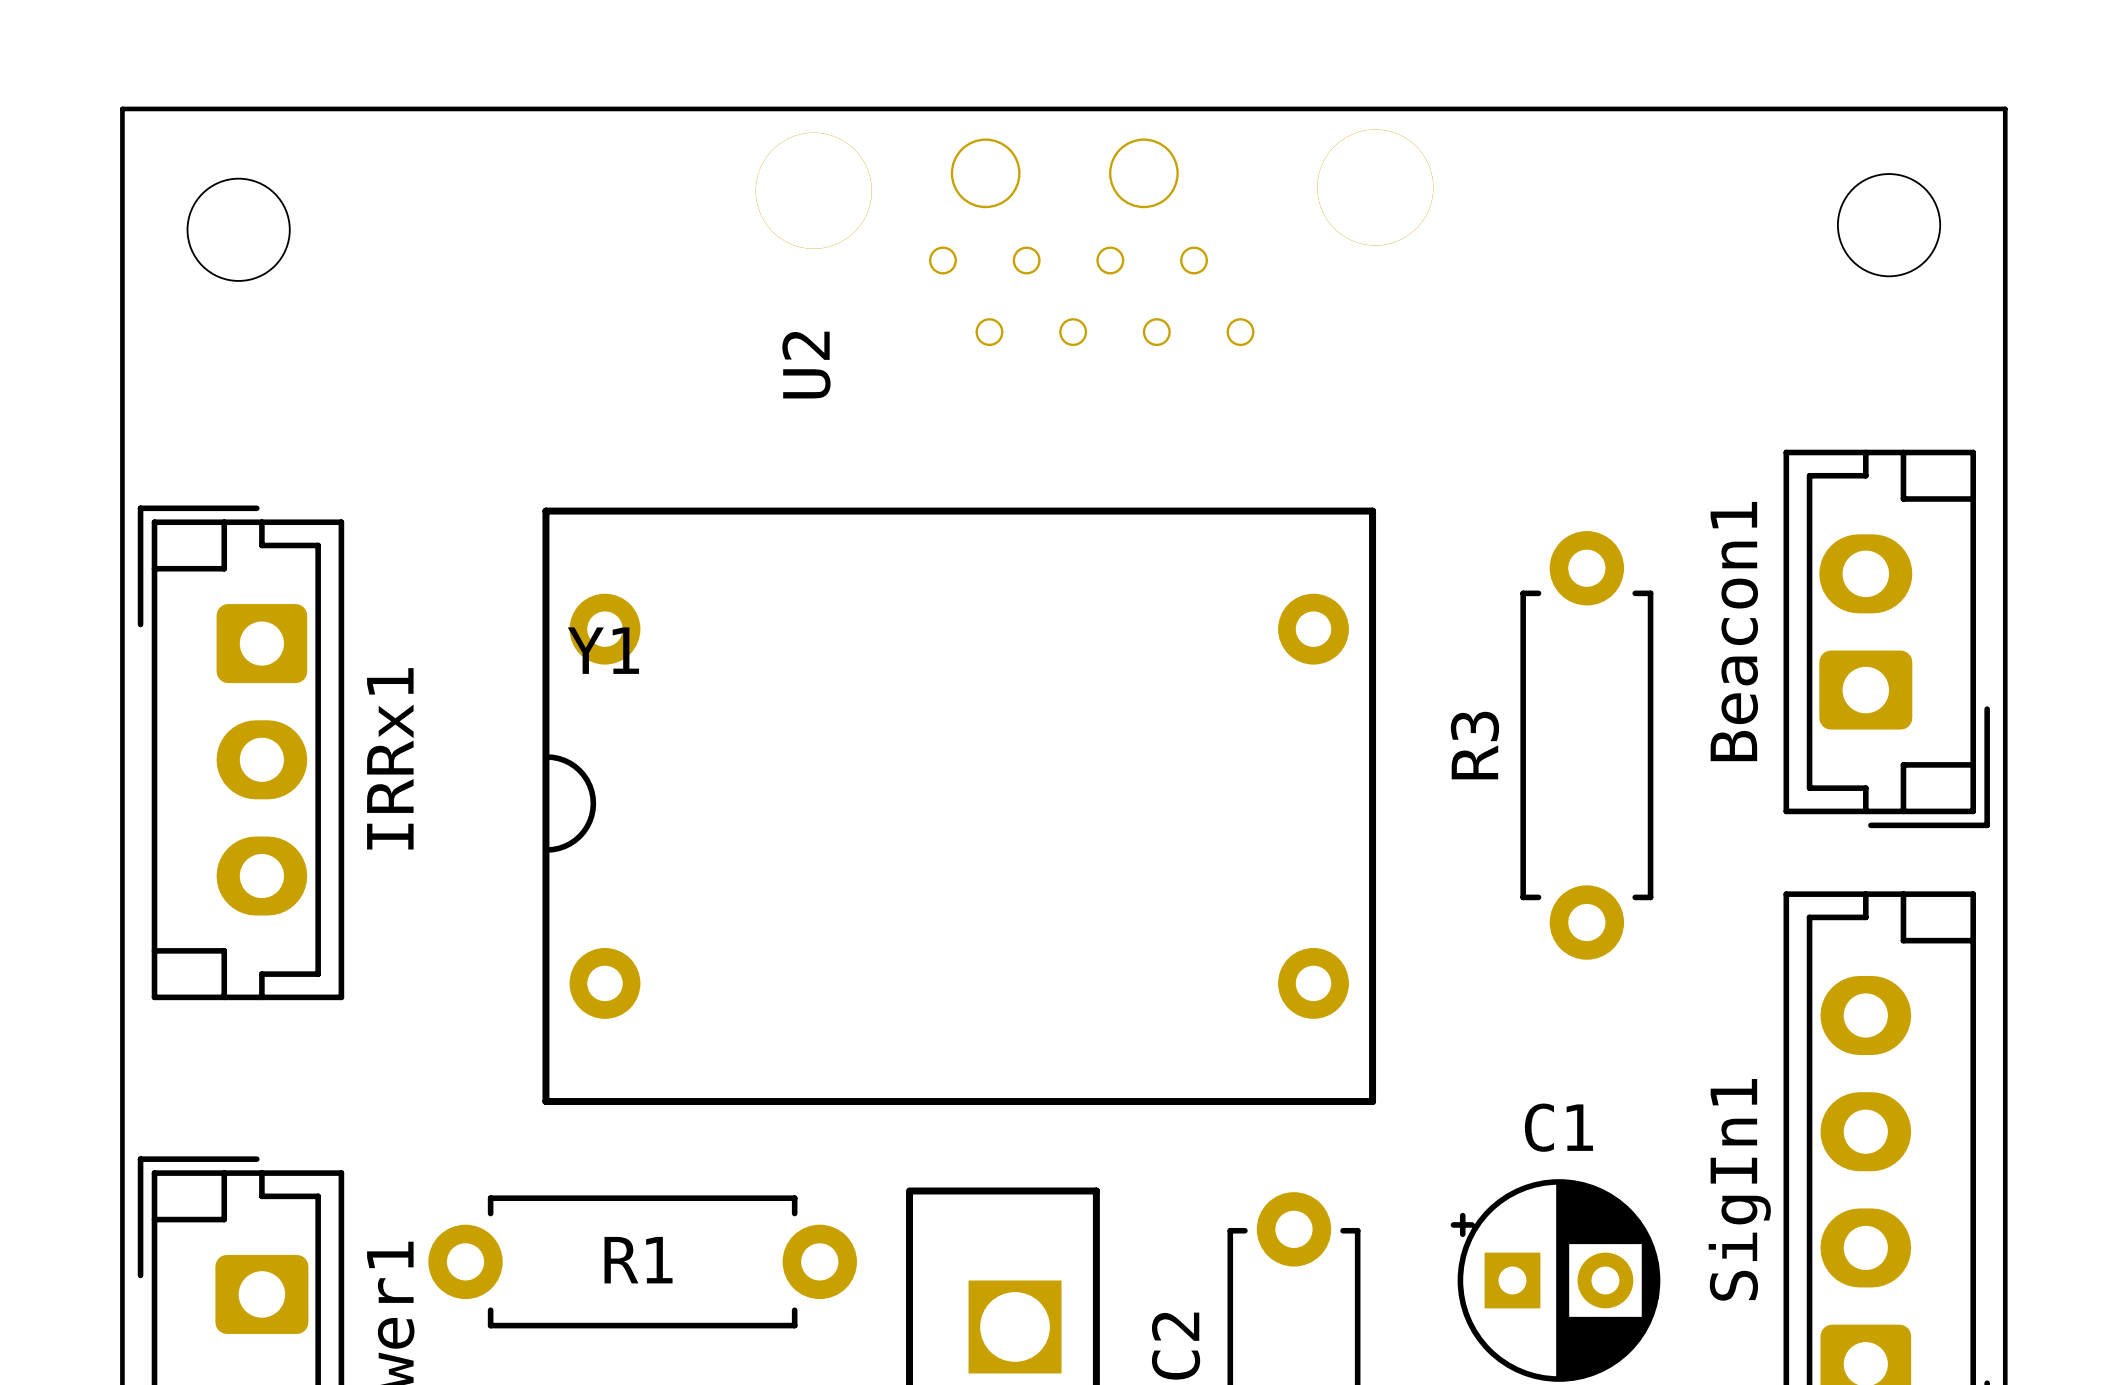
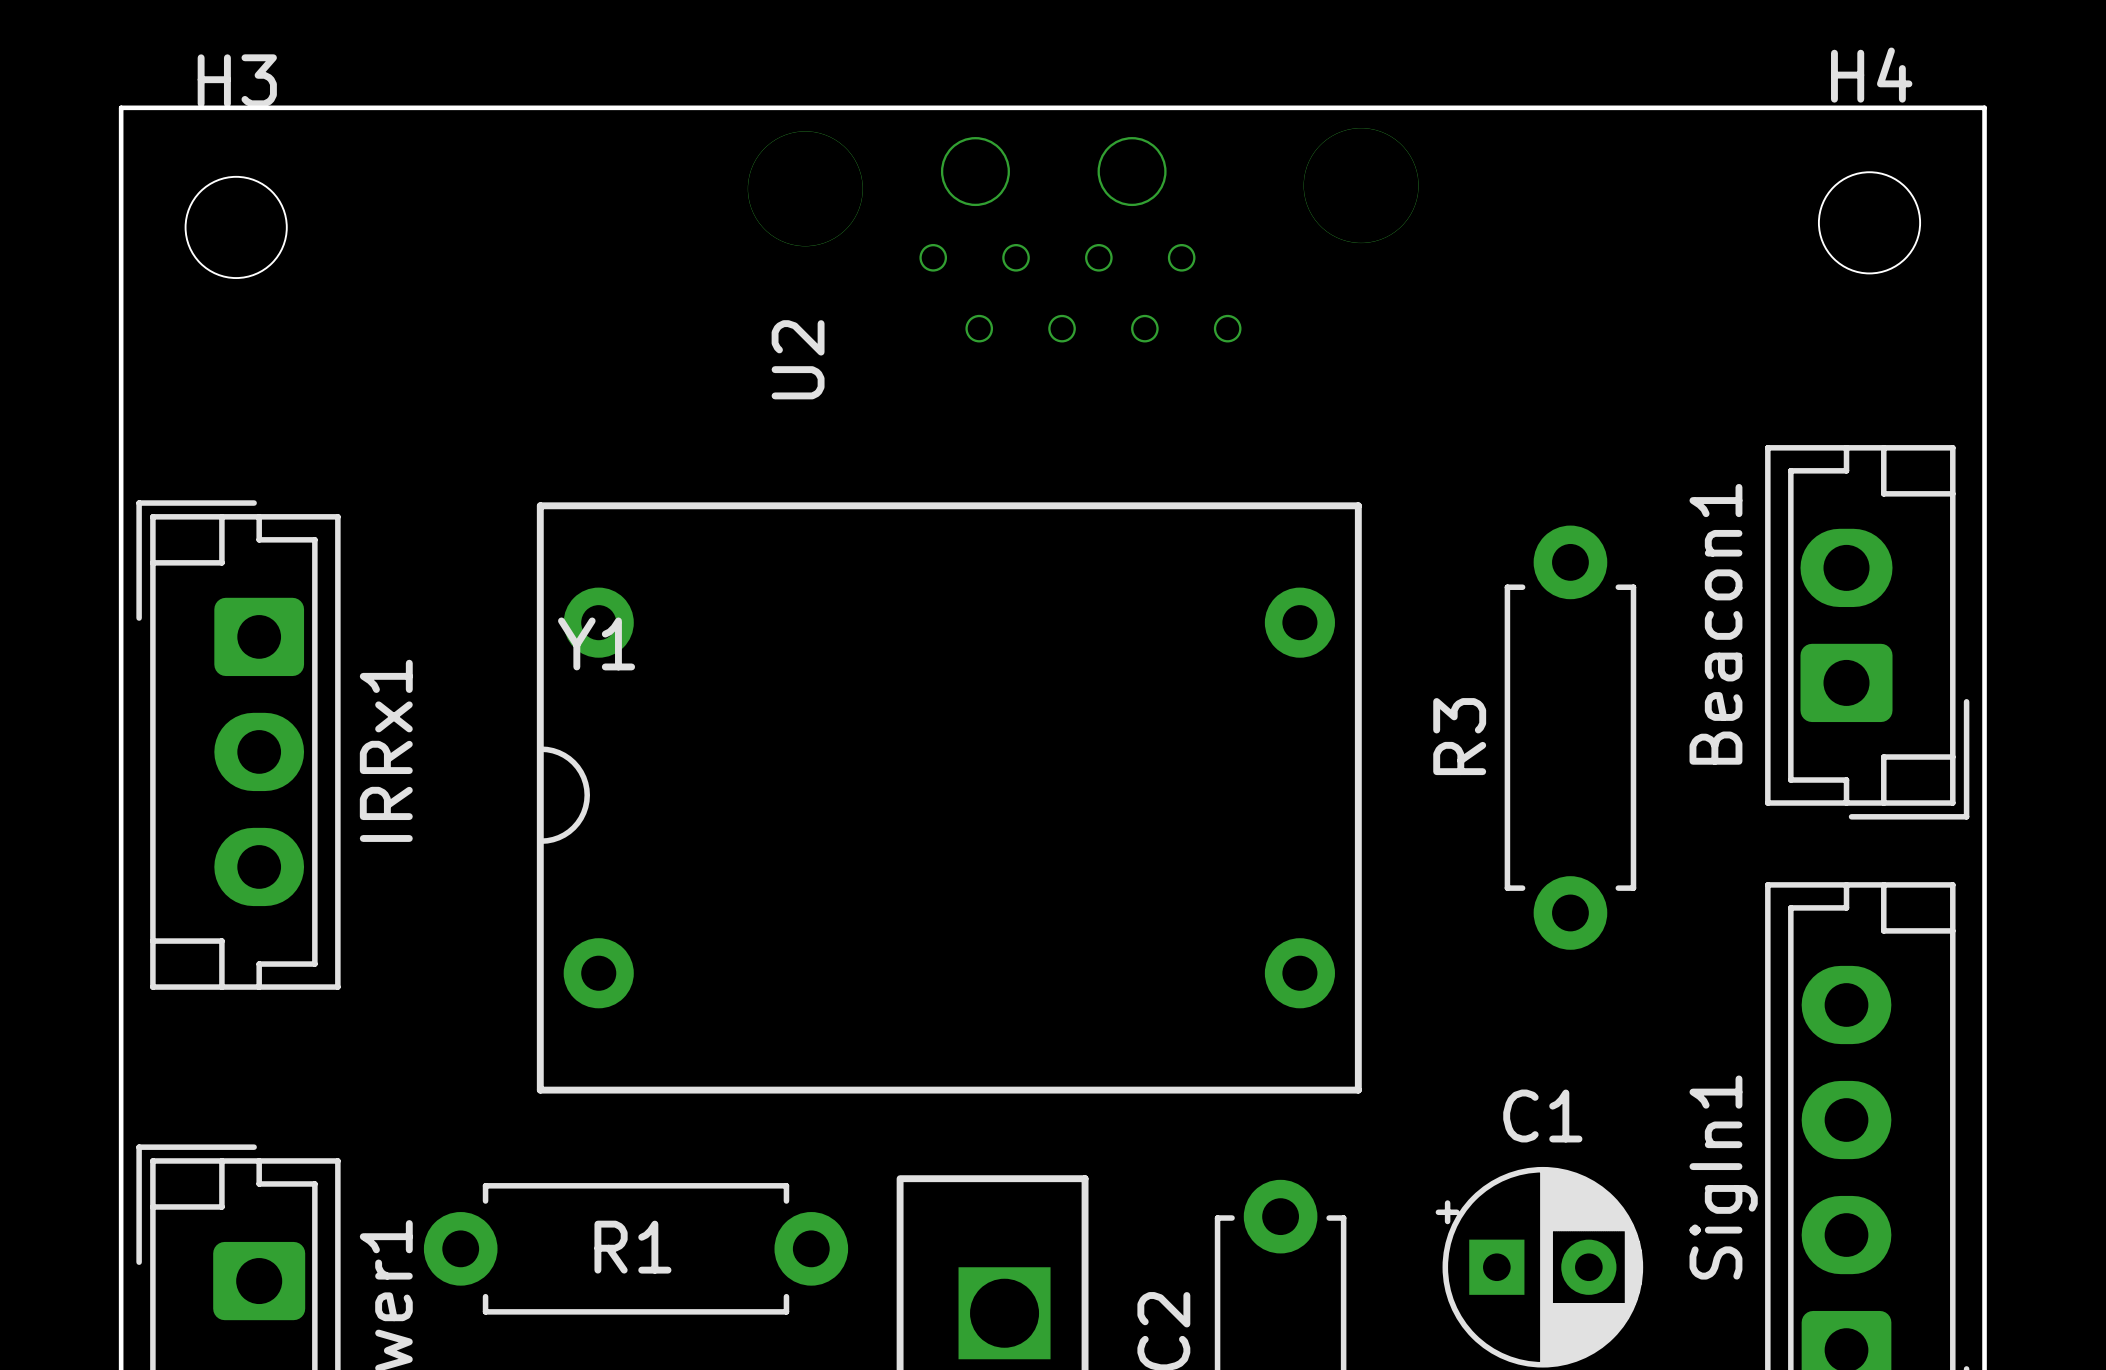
H4 name: none -> H4 (1871, 75)
H3 name: none -> H3 (237, 80)

